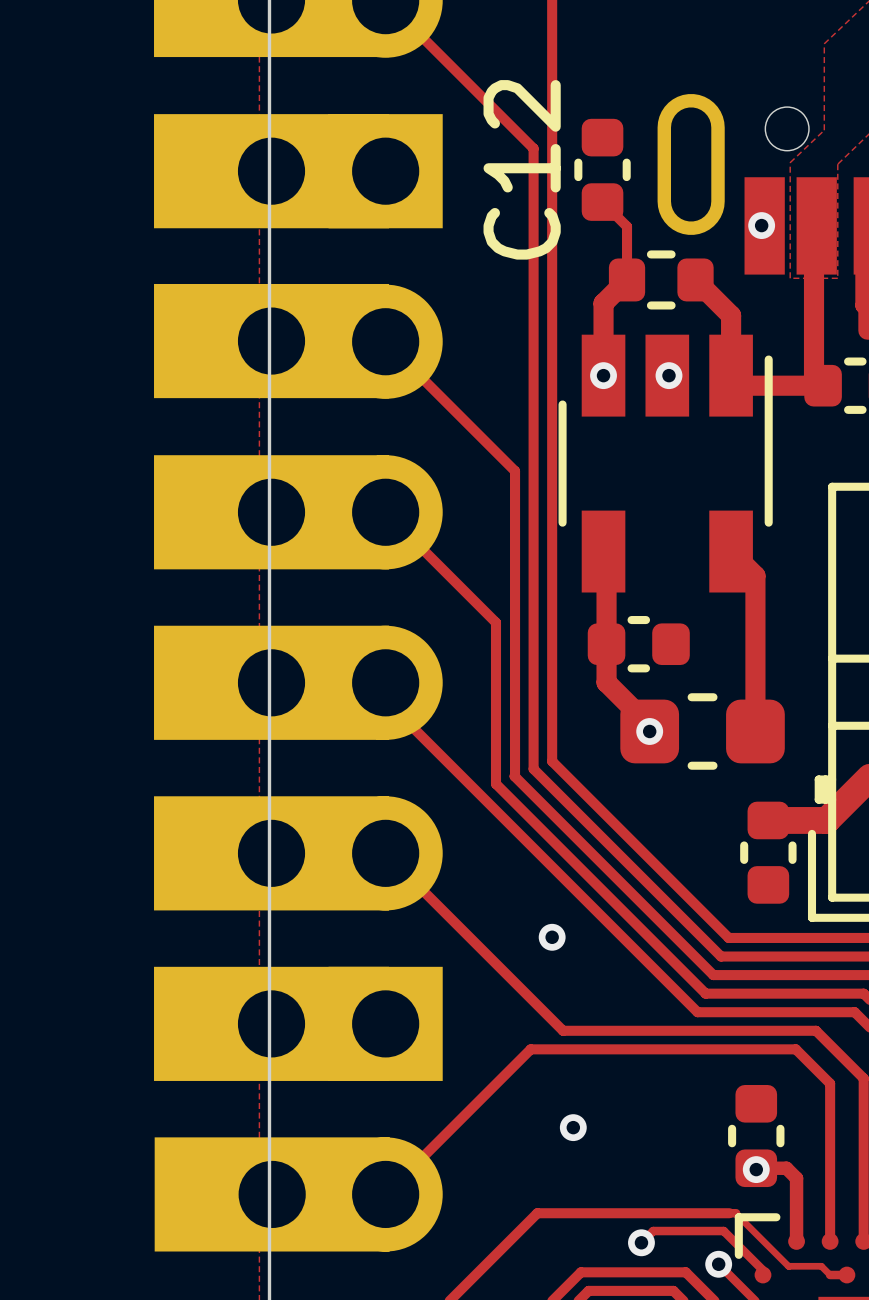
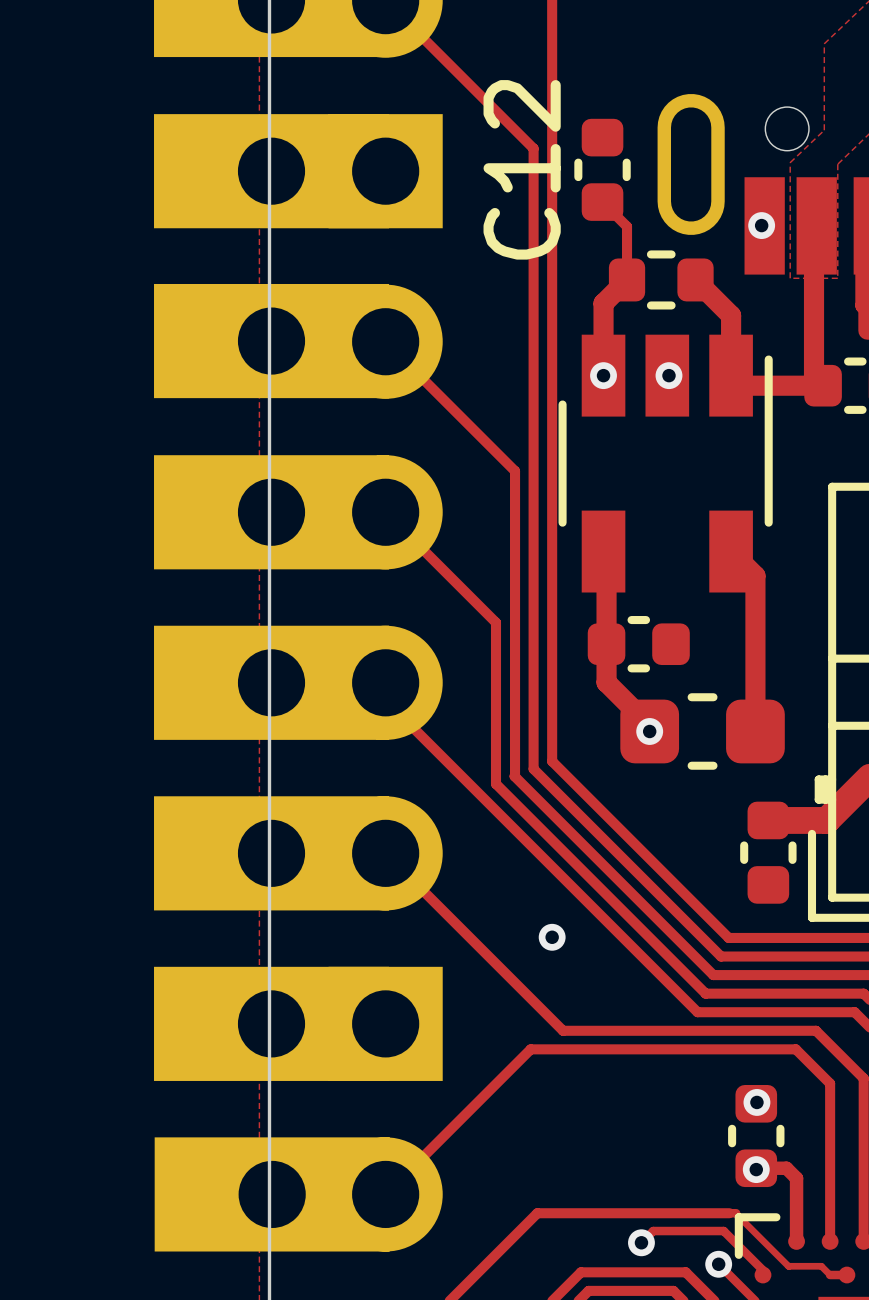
via: none -> (756, 1102)
via: (573, 1127) -> none

